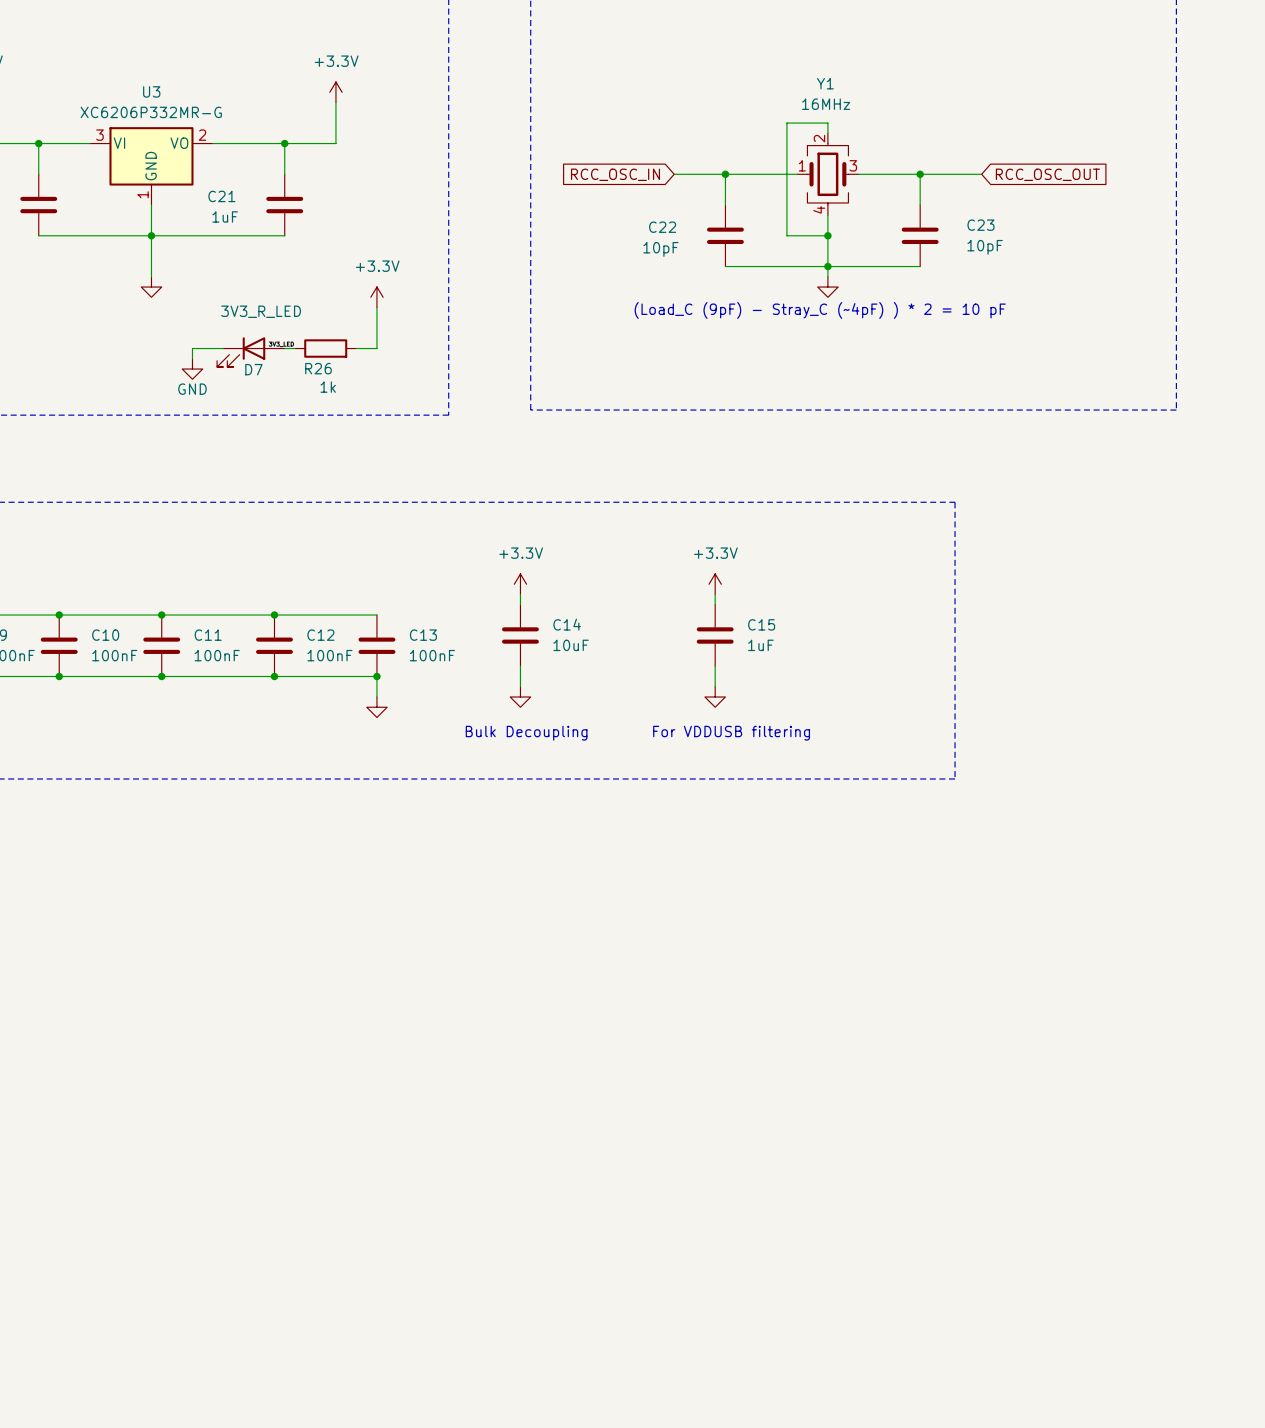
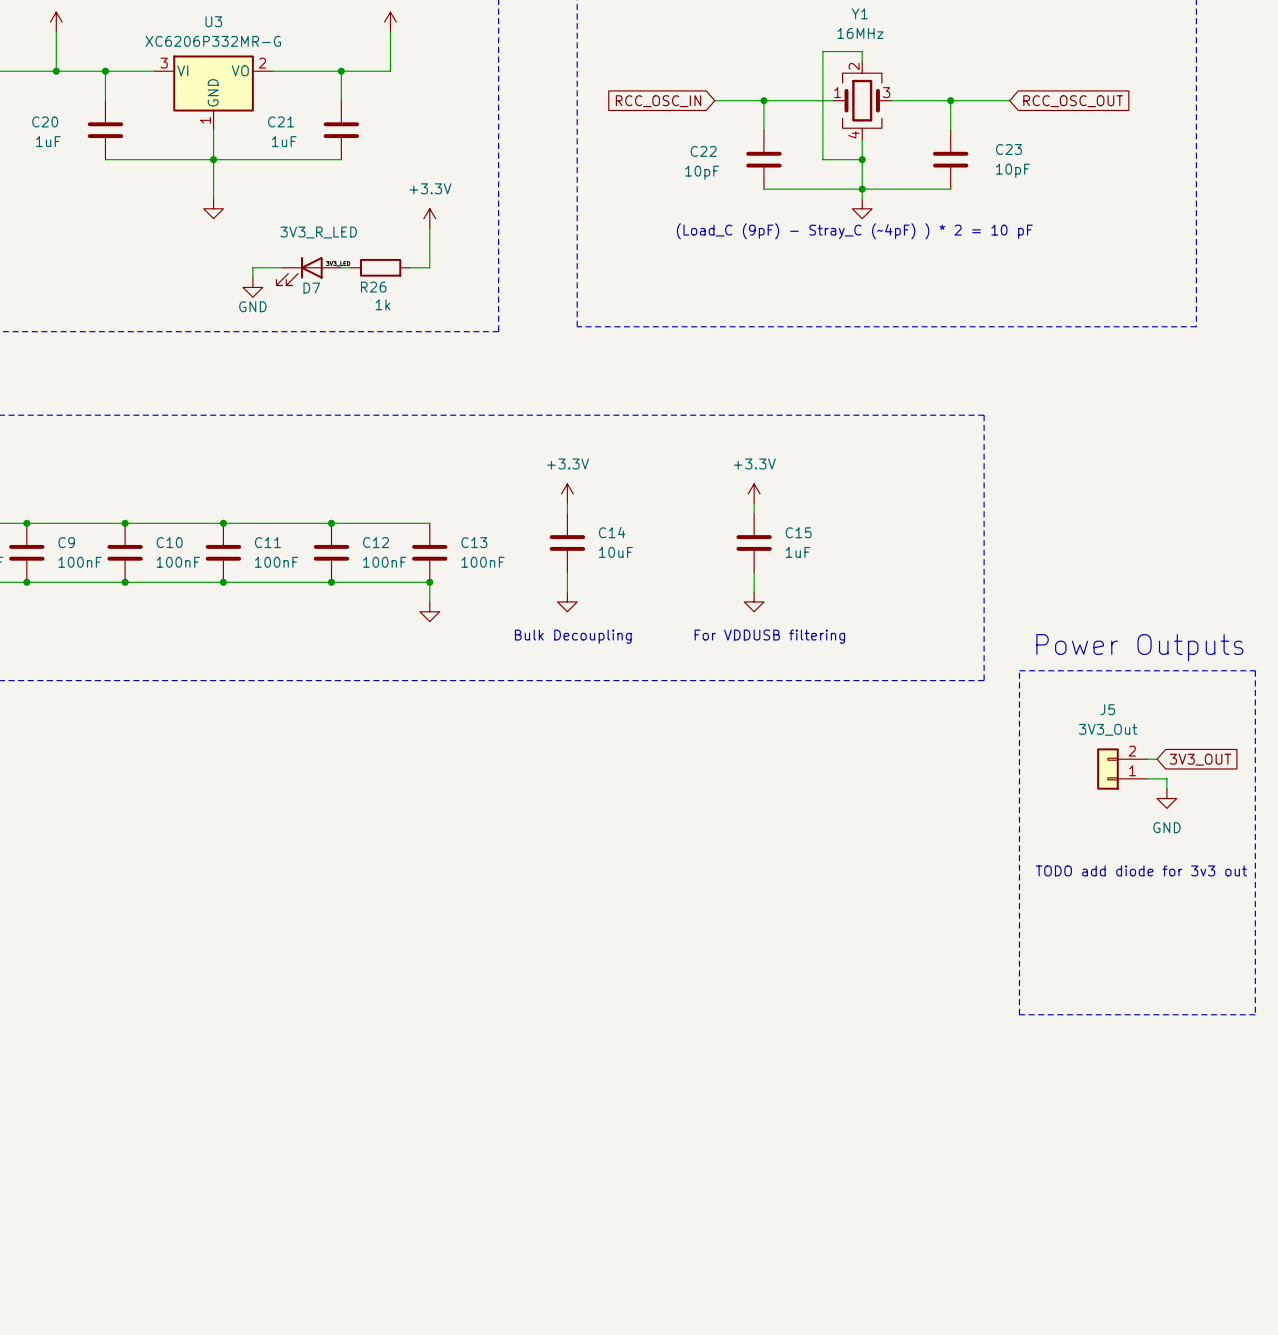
text: none -> Power Outputs (1139, 647)
line: none -> (1019, 670) (1255, 670) (1255, 1014) (1019, 1014) (1019, 670)
wire: none -> (1147, 759) (1157, 759)
global label: none -> 3V3_OUT (1200, 759)
J5: none -> 3V3_Out (1122, 769)
wire: none -> (1147, 778) (1166, 778) (1166, 788)
power symbol: none -> GND (1166, 798)
text: none -> TODO add diode for 3v3 out (1141, 870)

